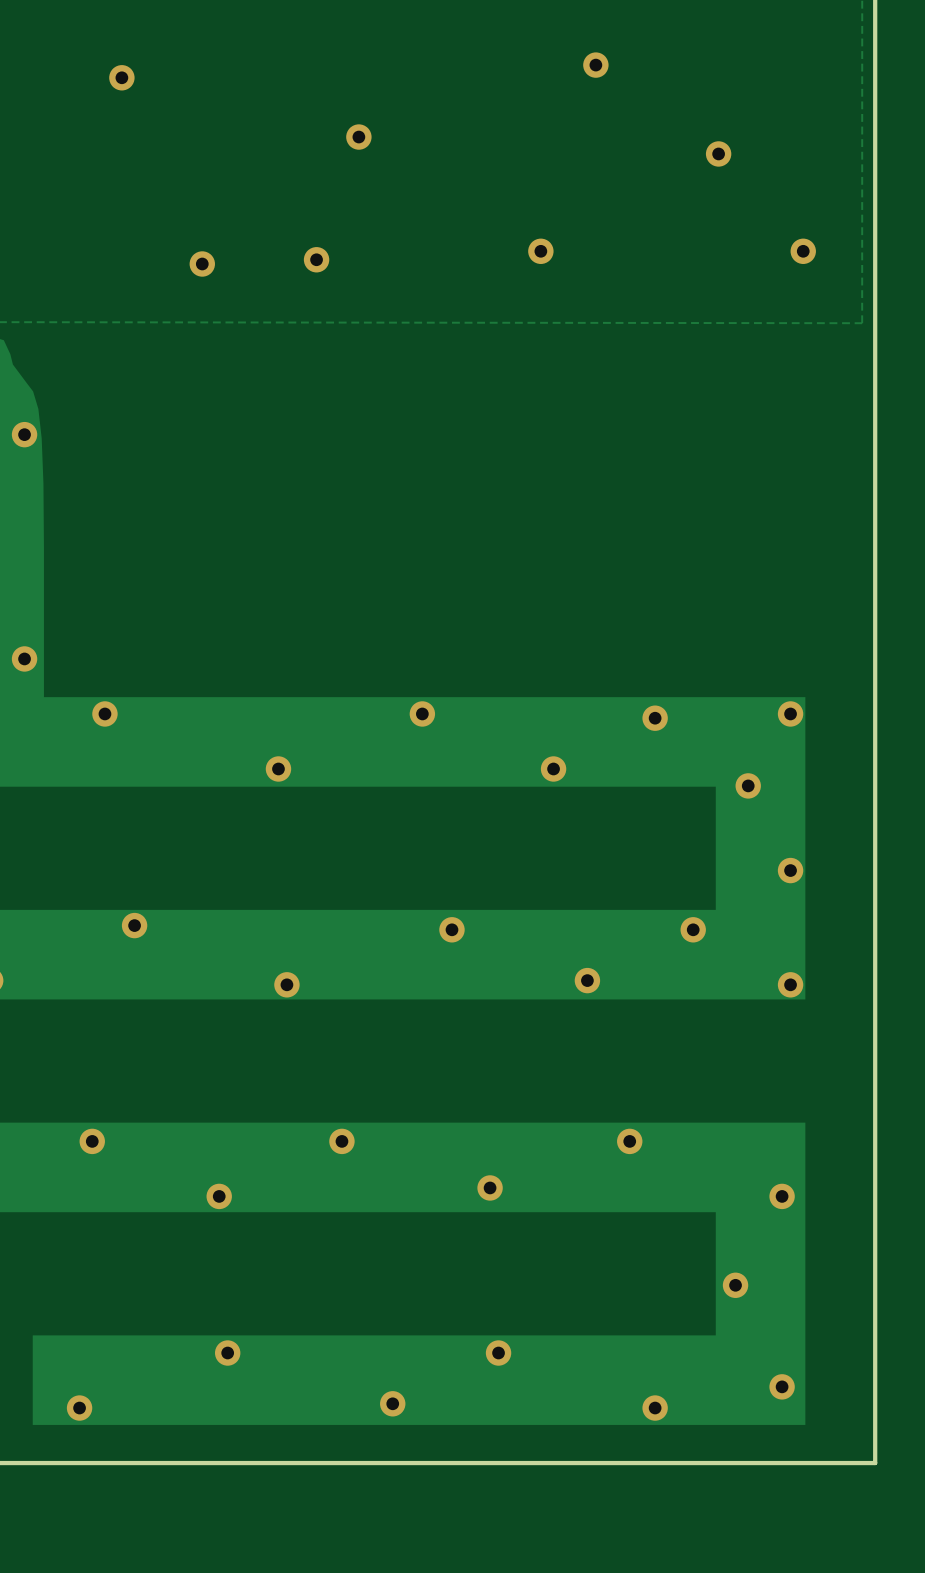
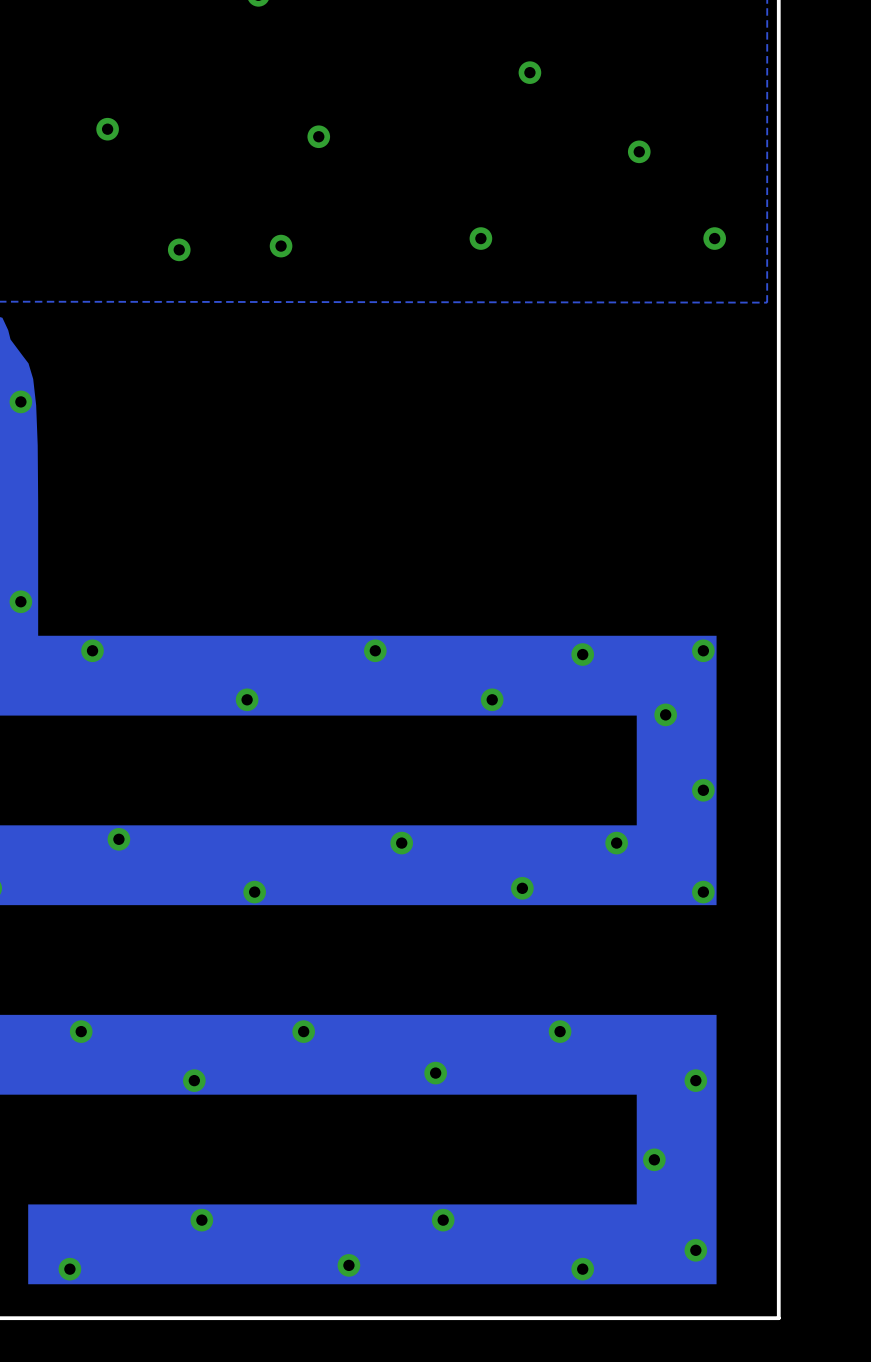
via position: (121, 77) -> (107, 129)

